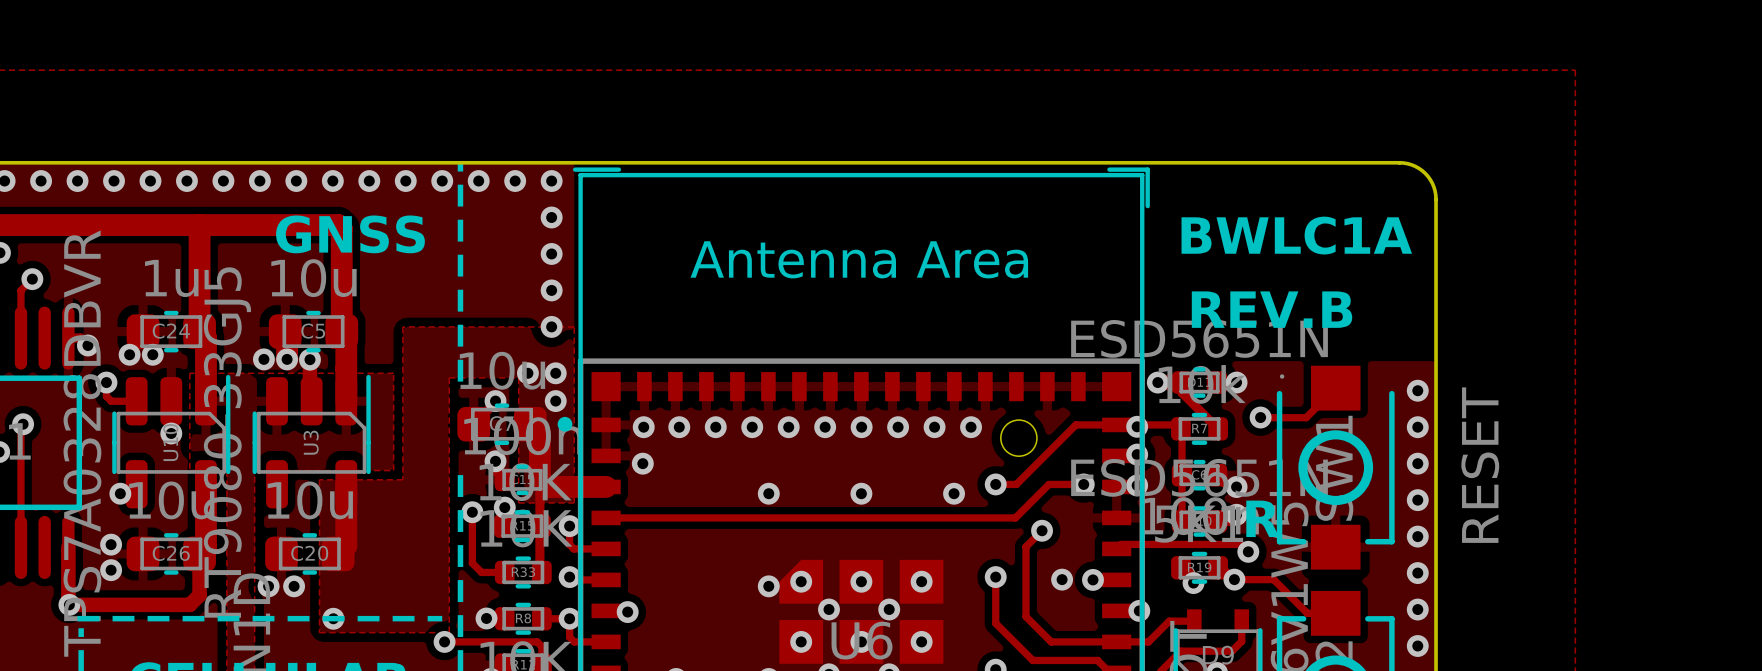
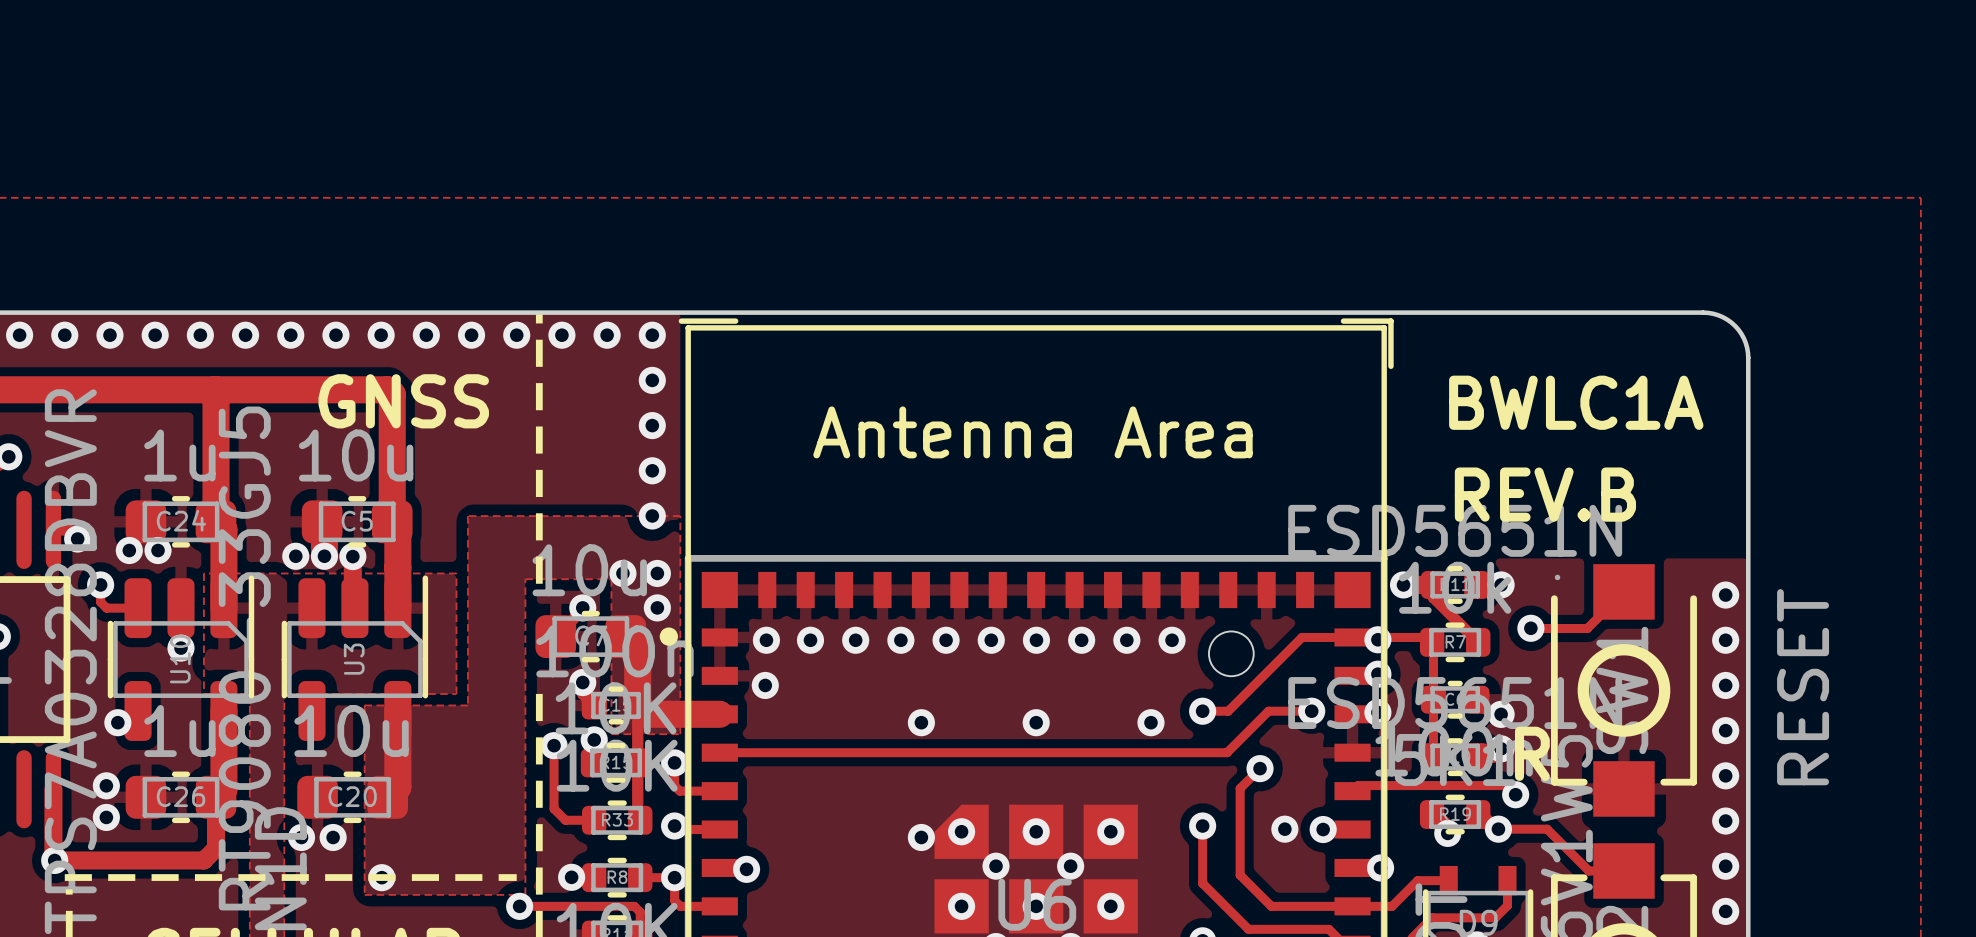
C26 value: 10u (171, 500) -> 1u (179, 730)

